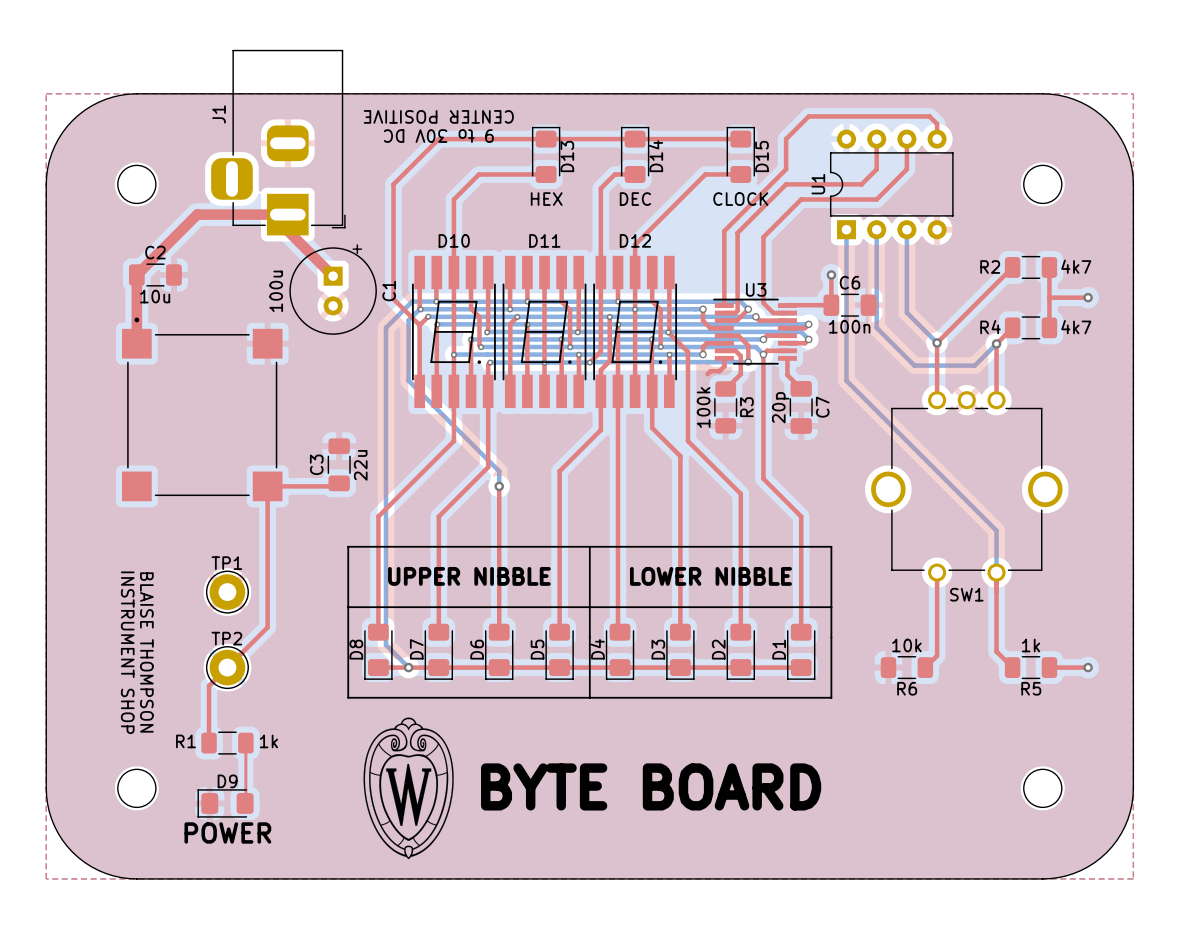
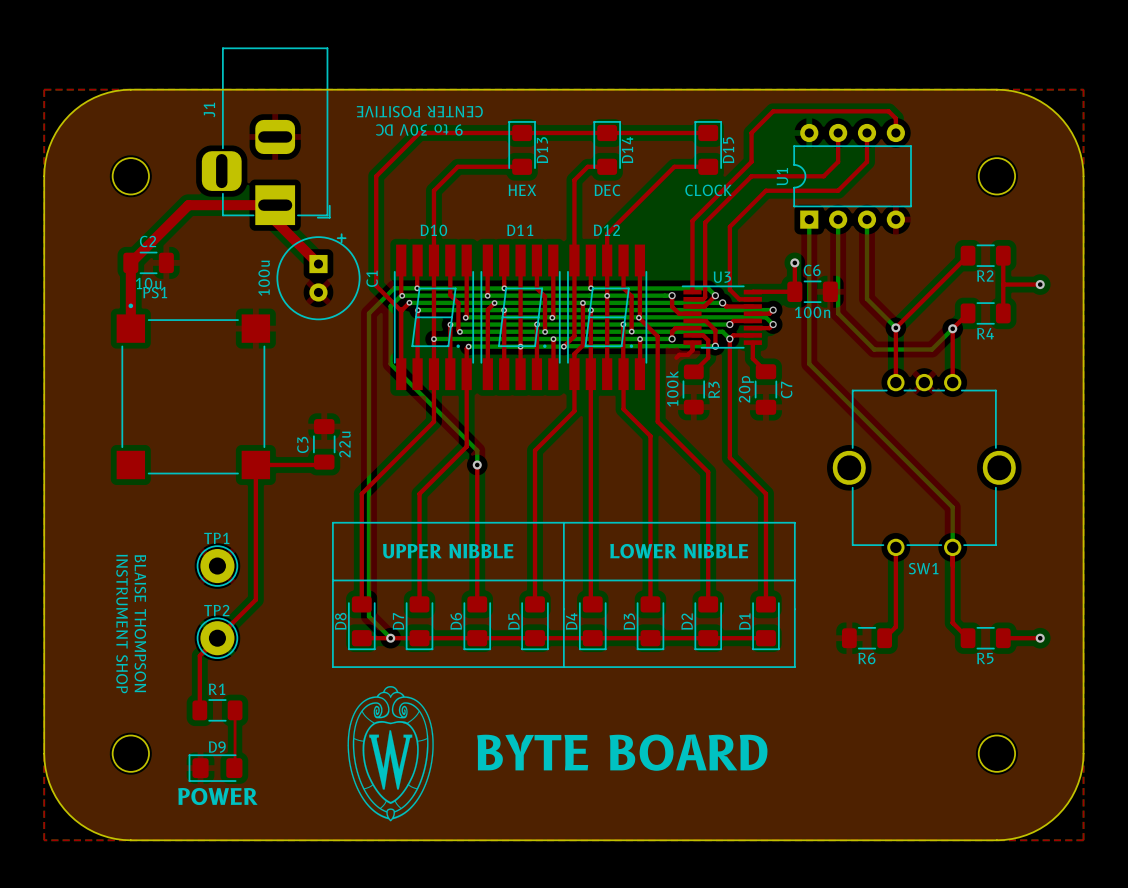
R2 value: 4k7 (1076, 266) -> none
R2 name position: R2 (990, 267) -> R2 (985, 275)
PS1 name: none -> PS1 (155, 292)
R4 name position: R4 (990, 327) -> R4 (985, 333)
R4 value: 4k7 (1076, 327) -> none
R6 value: 10k (906, 645) -> none
R5 value: 1k (1031, 645) -> none
R1 name position: R1 (186, 741) -> R1 (217, 689)
R1 value: 1k (268, 741) -> none

